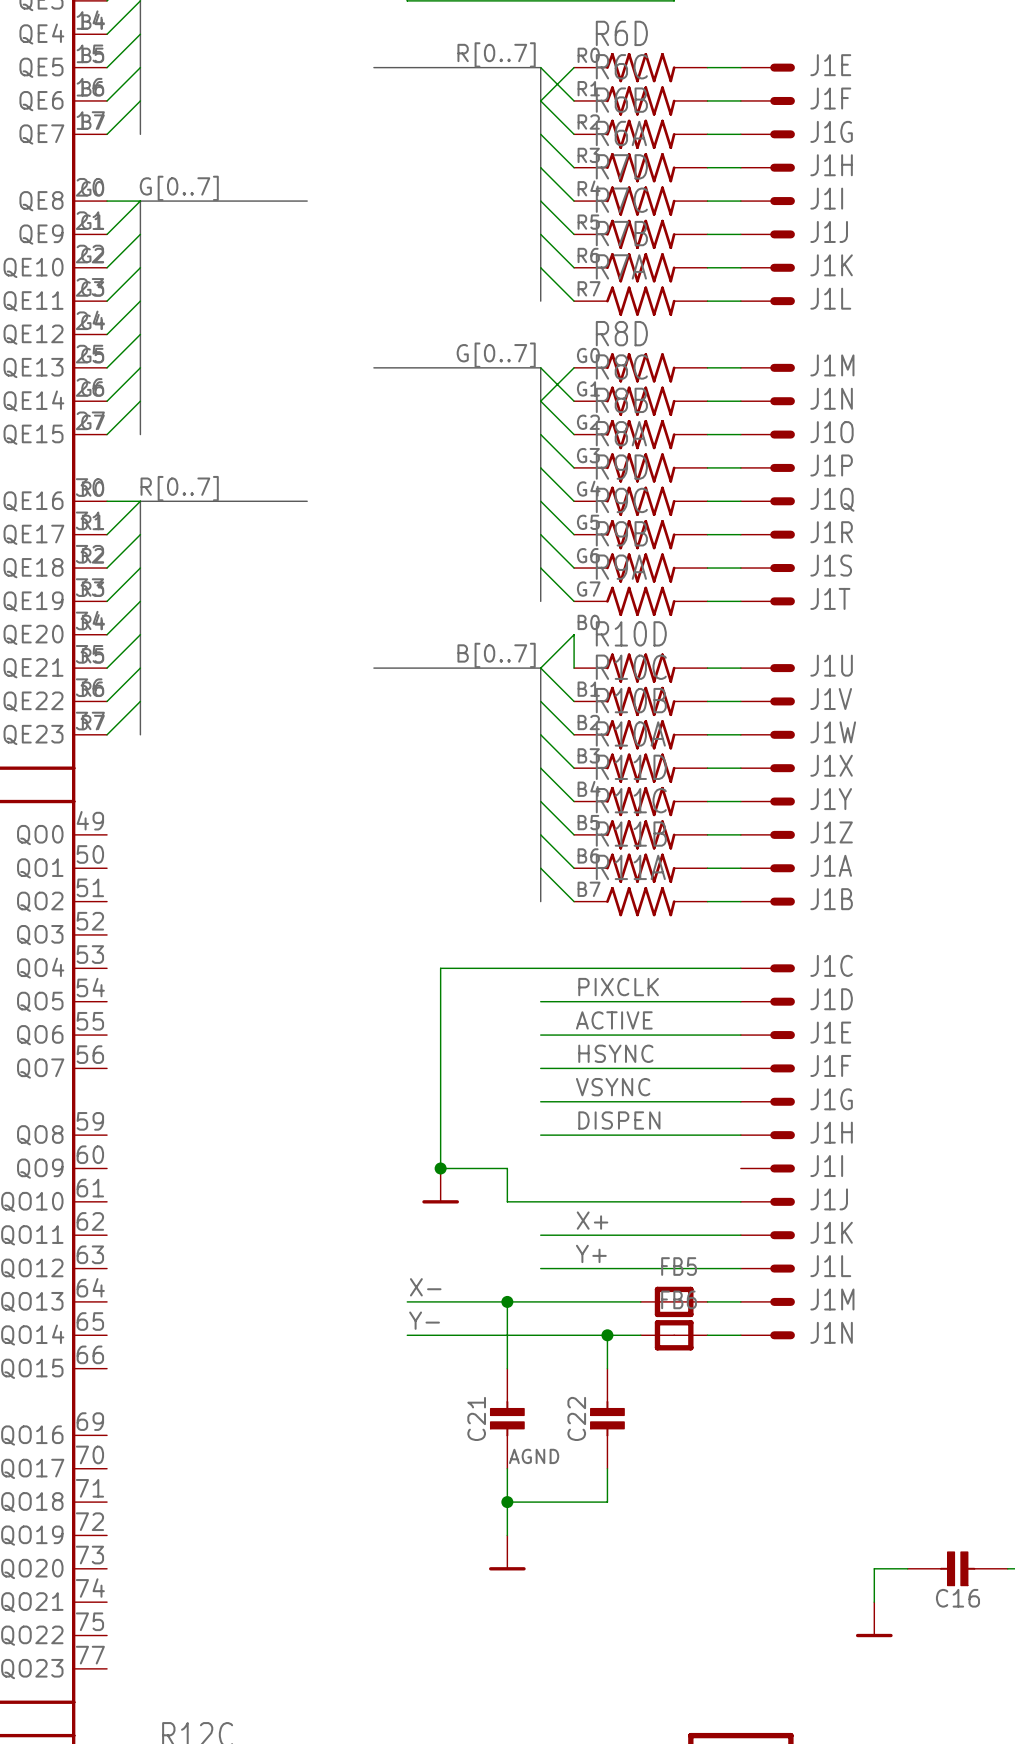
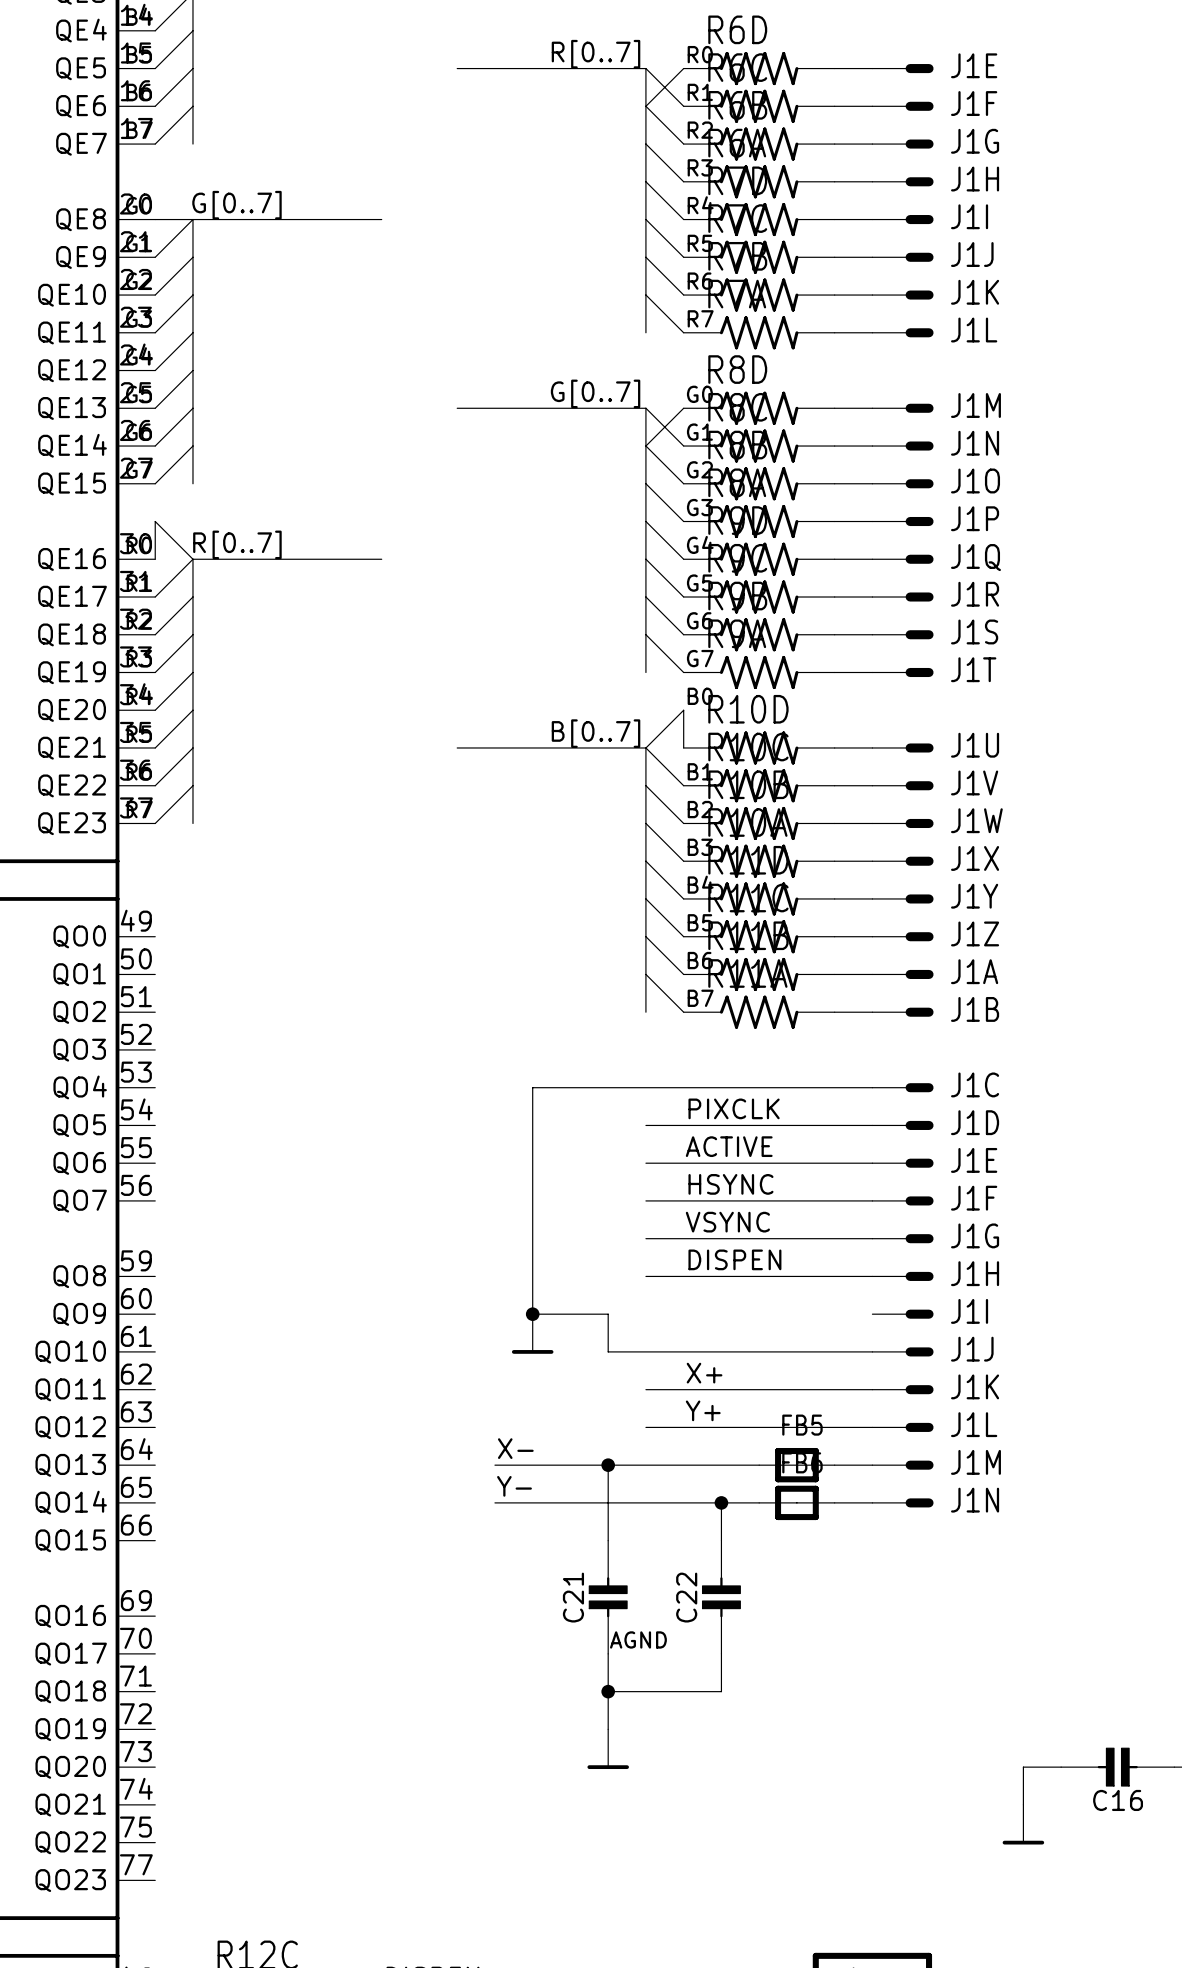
wire: (107, 501) (140, 501) -> (155, 559) (155, 521) (192, 559)

